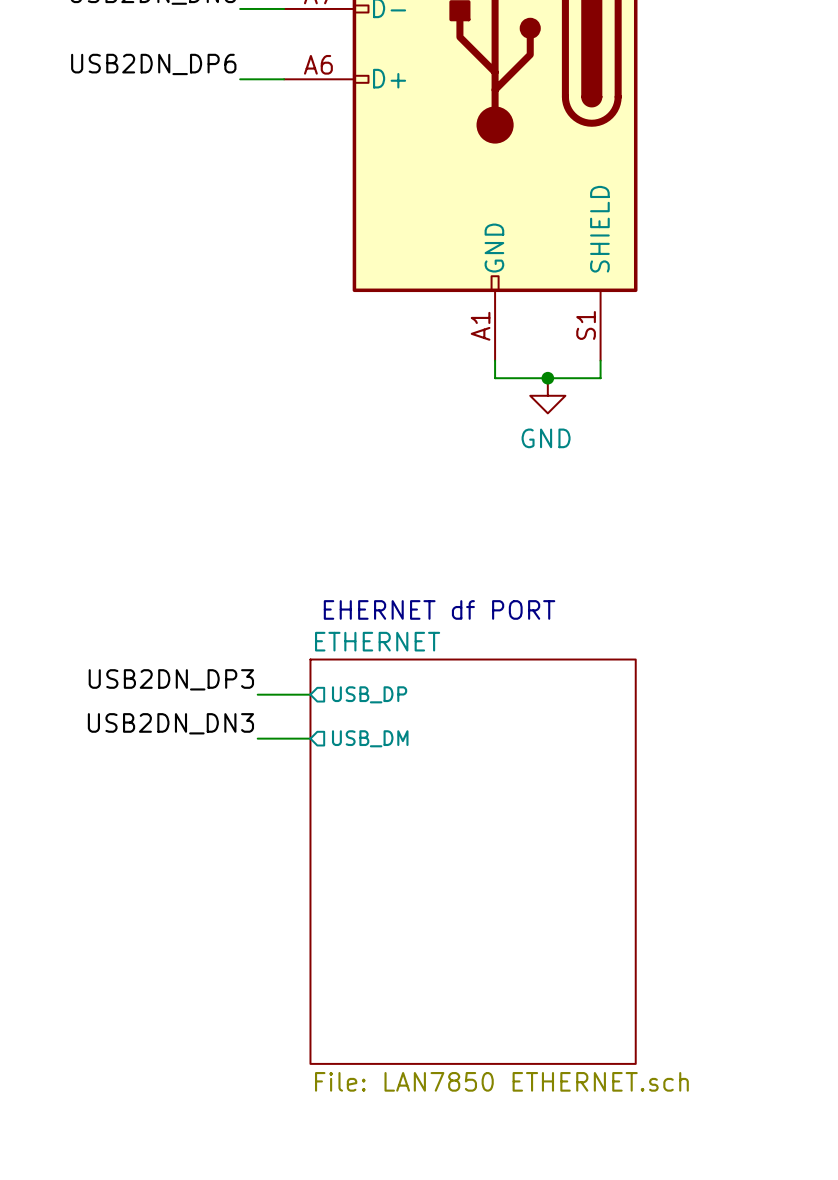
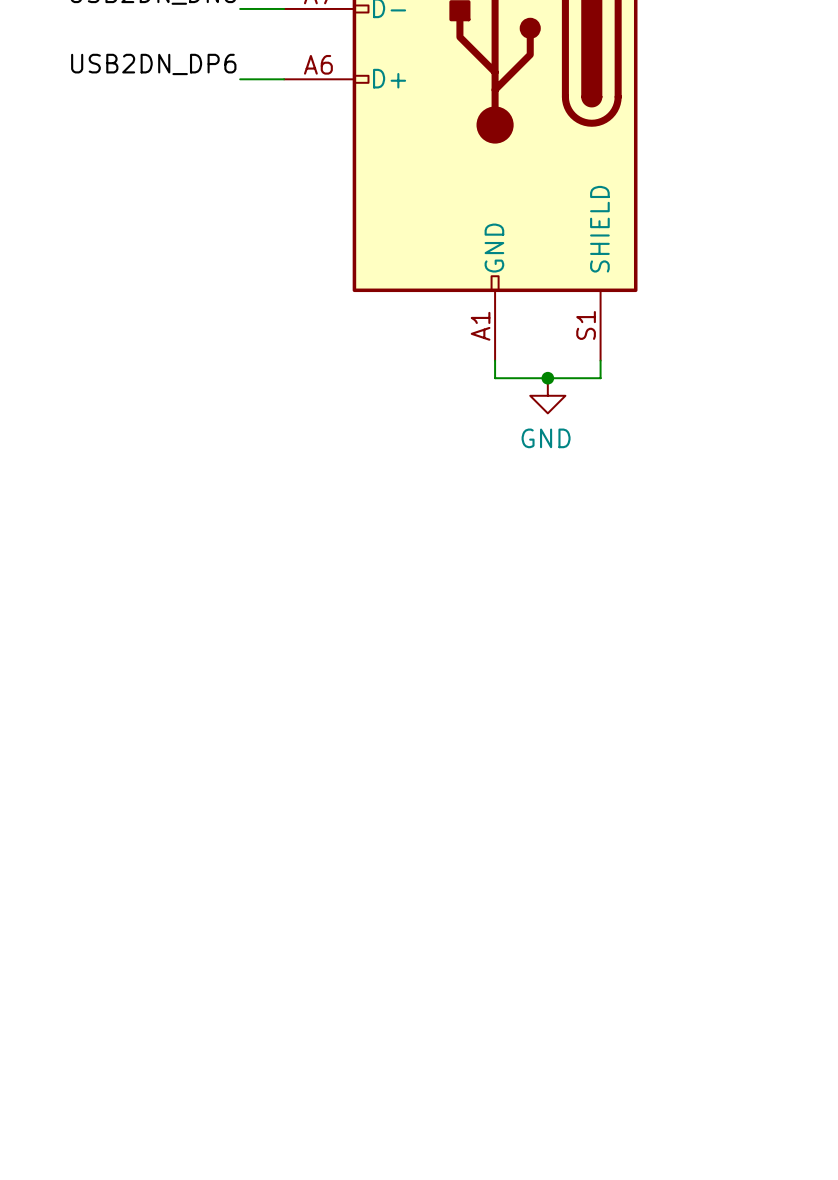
text: EHERNET df PORT (439, 609) -> none
label: USB2DN_DP3 (171, 679) -> none
wire: (257, 694) (310, 694) -> none
sheet pin: USB_DP (369, 694) -> none
label: USB2DN_DN3 (170, 723) -> none
wire: (257, 738) (310, 738) -> none
sheet pin: USB_DM (370, 738) -> none
sheet ETHERNET: File: LAN7850 ETHERNET.sch (473, 861) -> none

